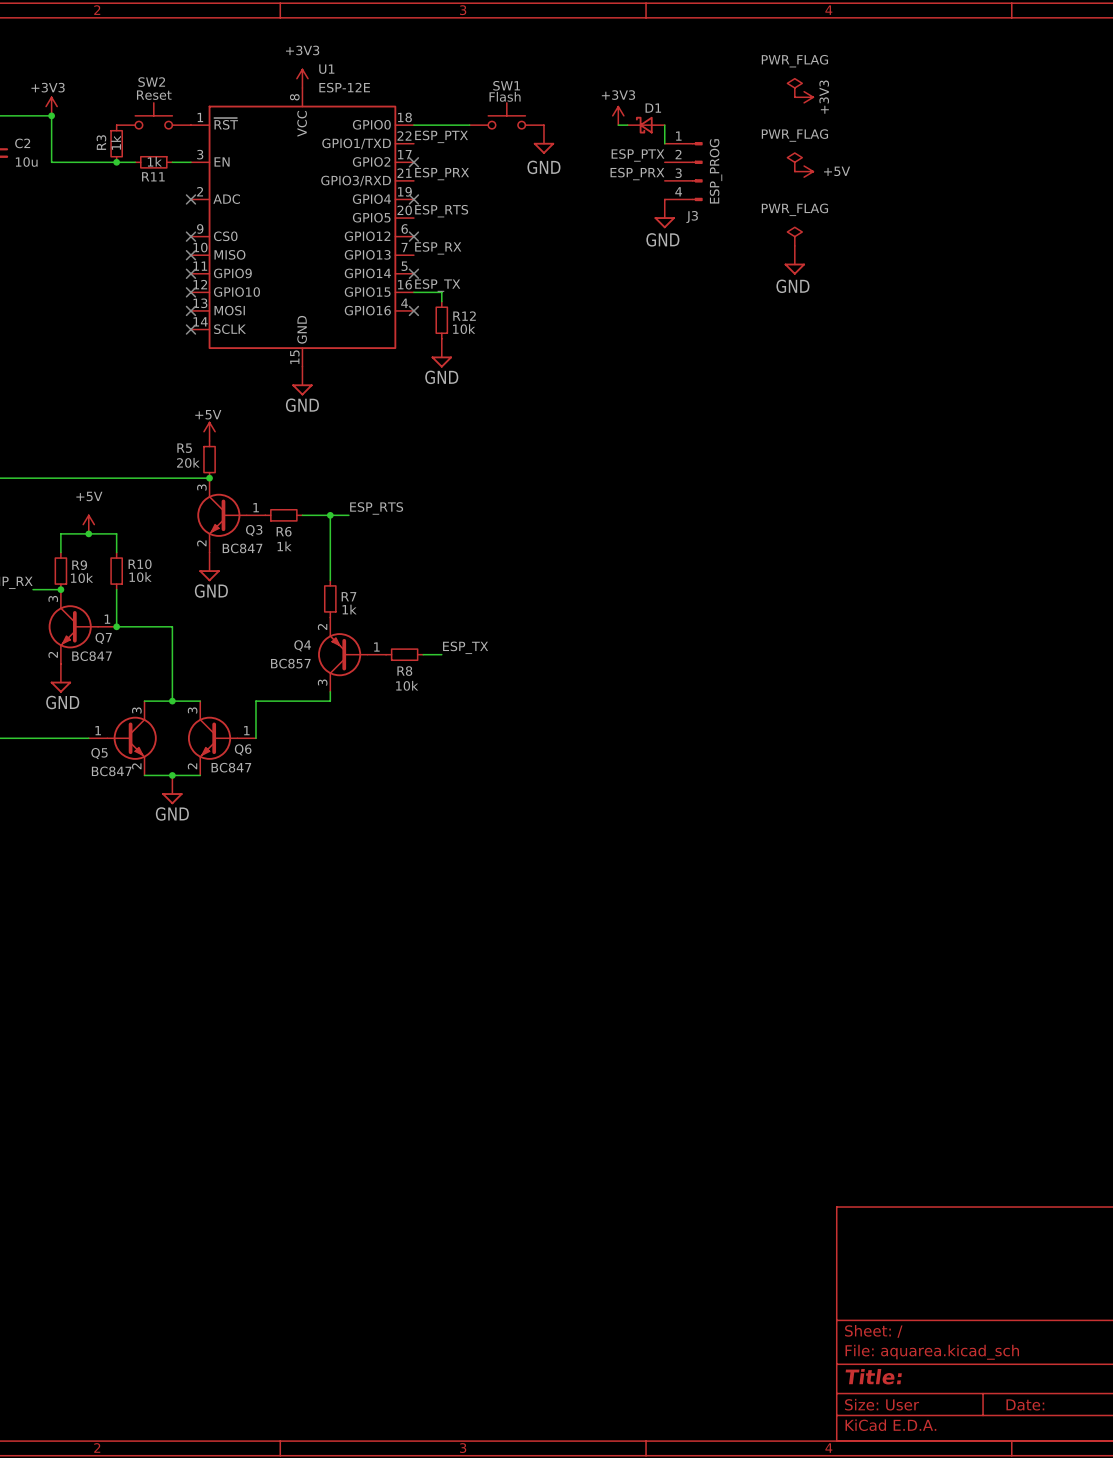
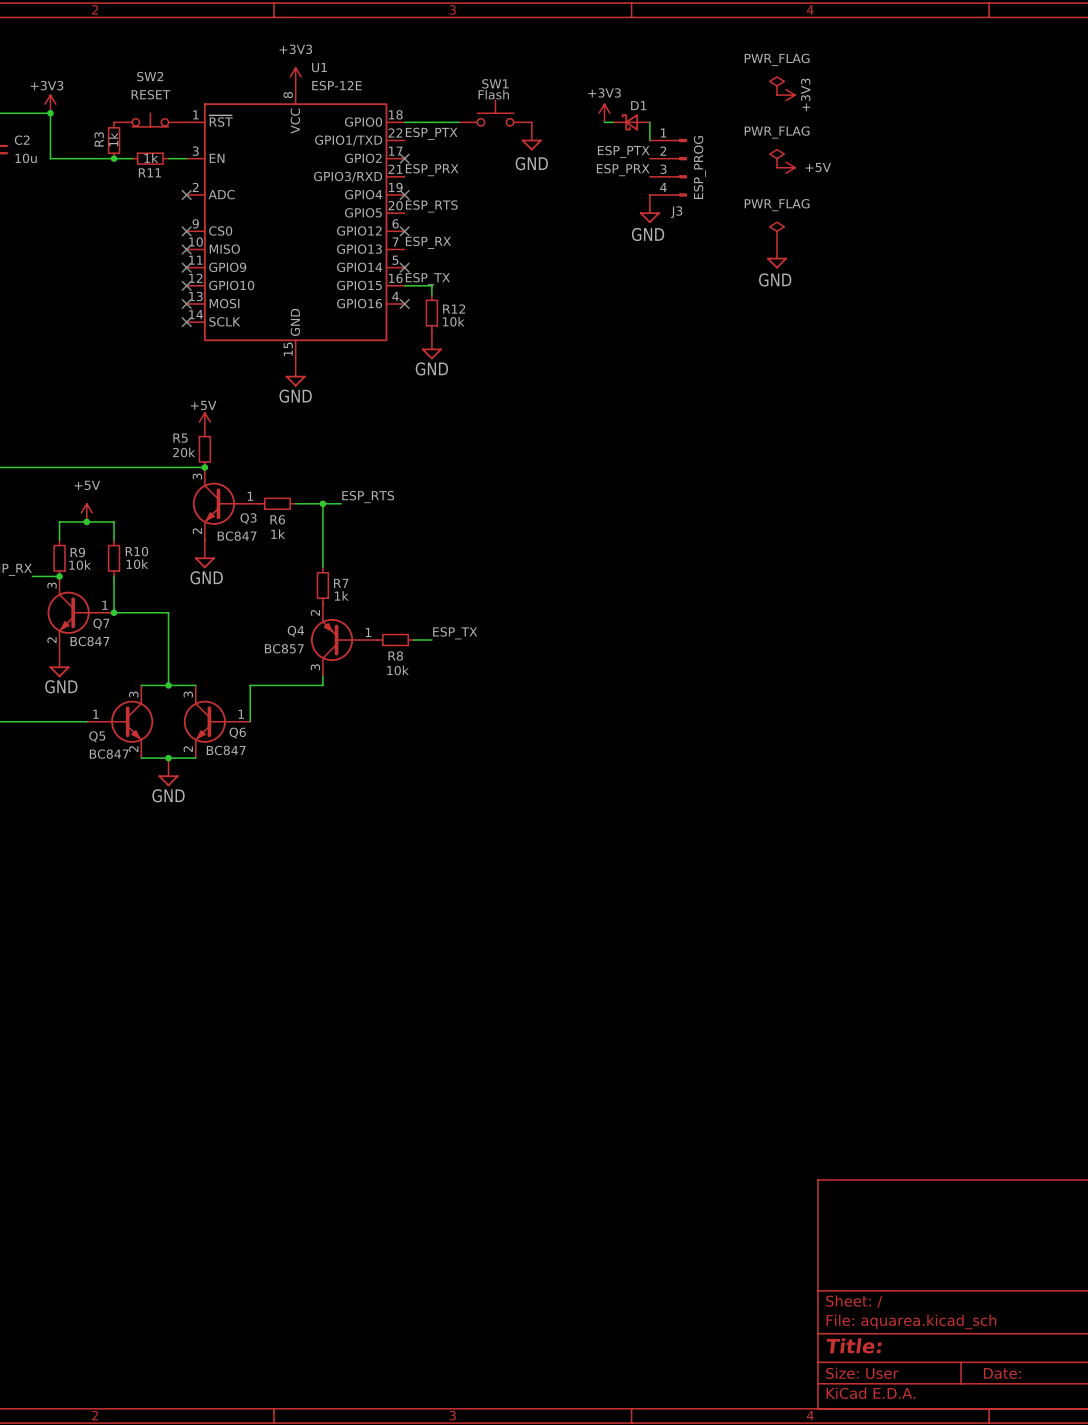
SW2 value: Reset (154, 95) -> RESET (150, 94)
SW2 symbol: [116, 102, 191, 129] -> [114, 113, 187, 127]

